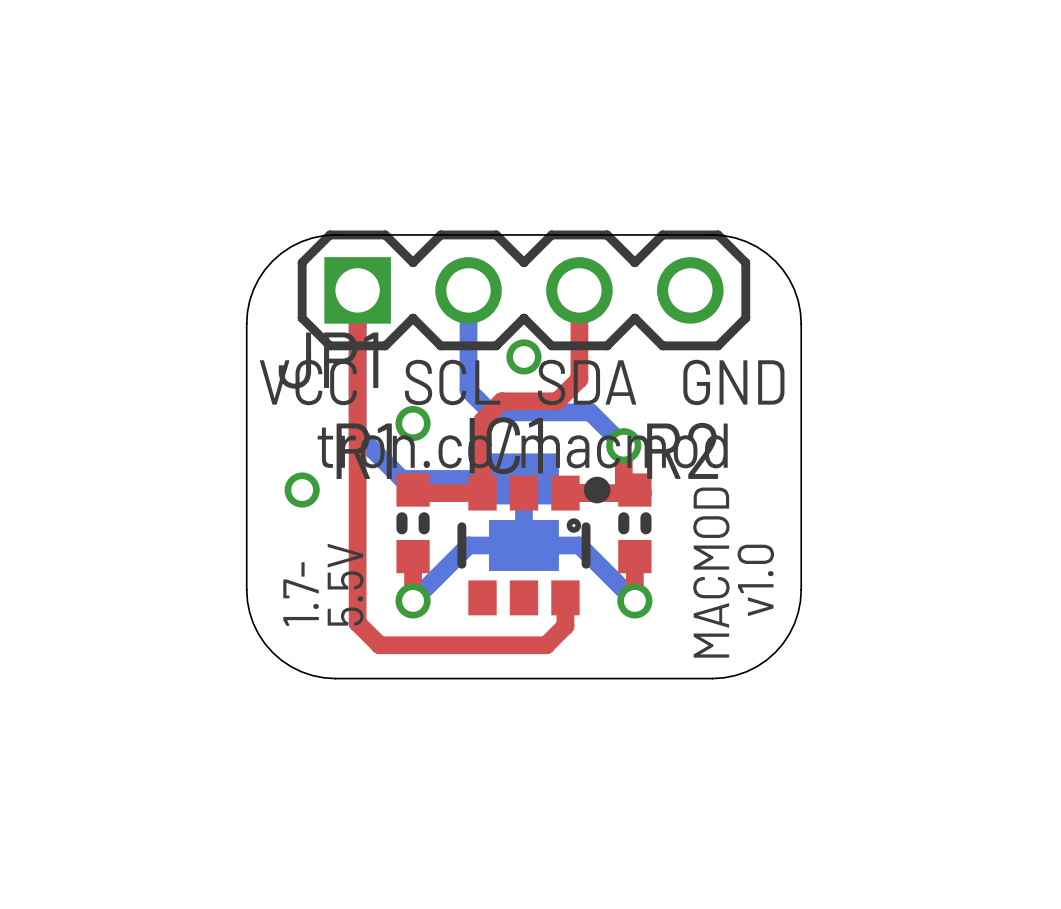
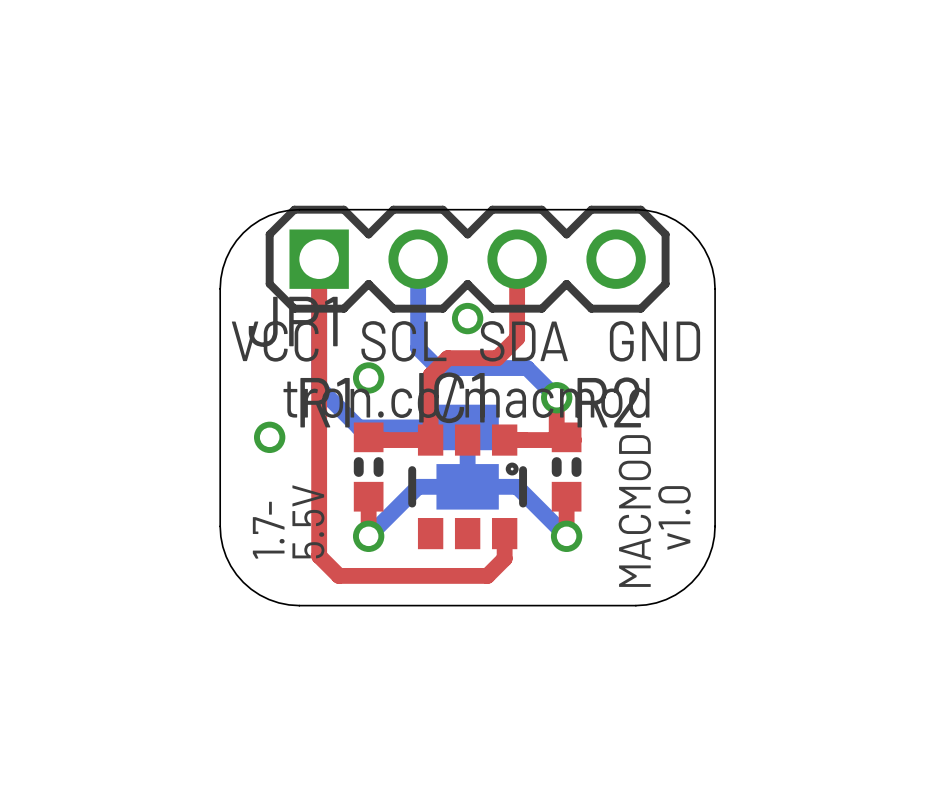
drawing: [583, 476, 611, 504] -> none

